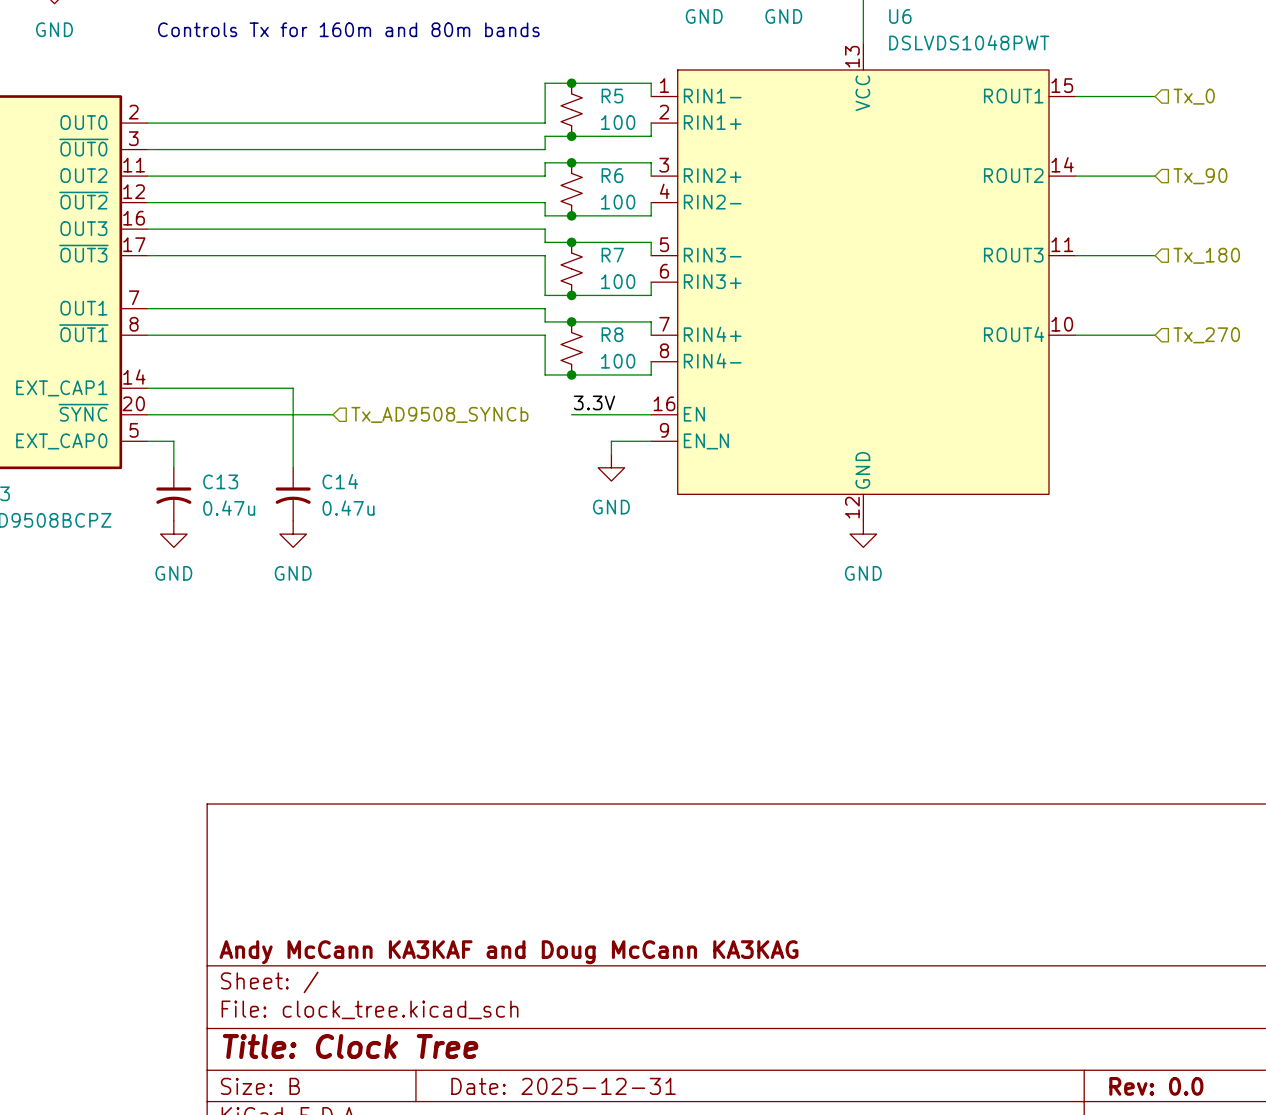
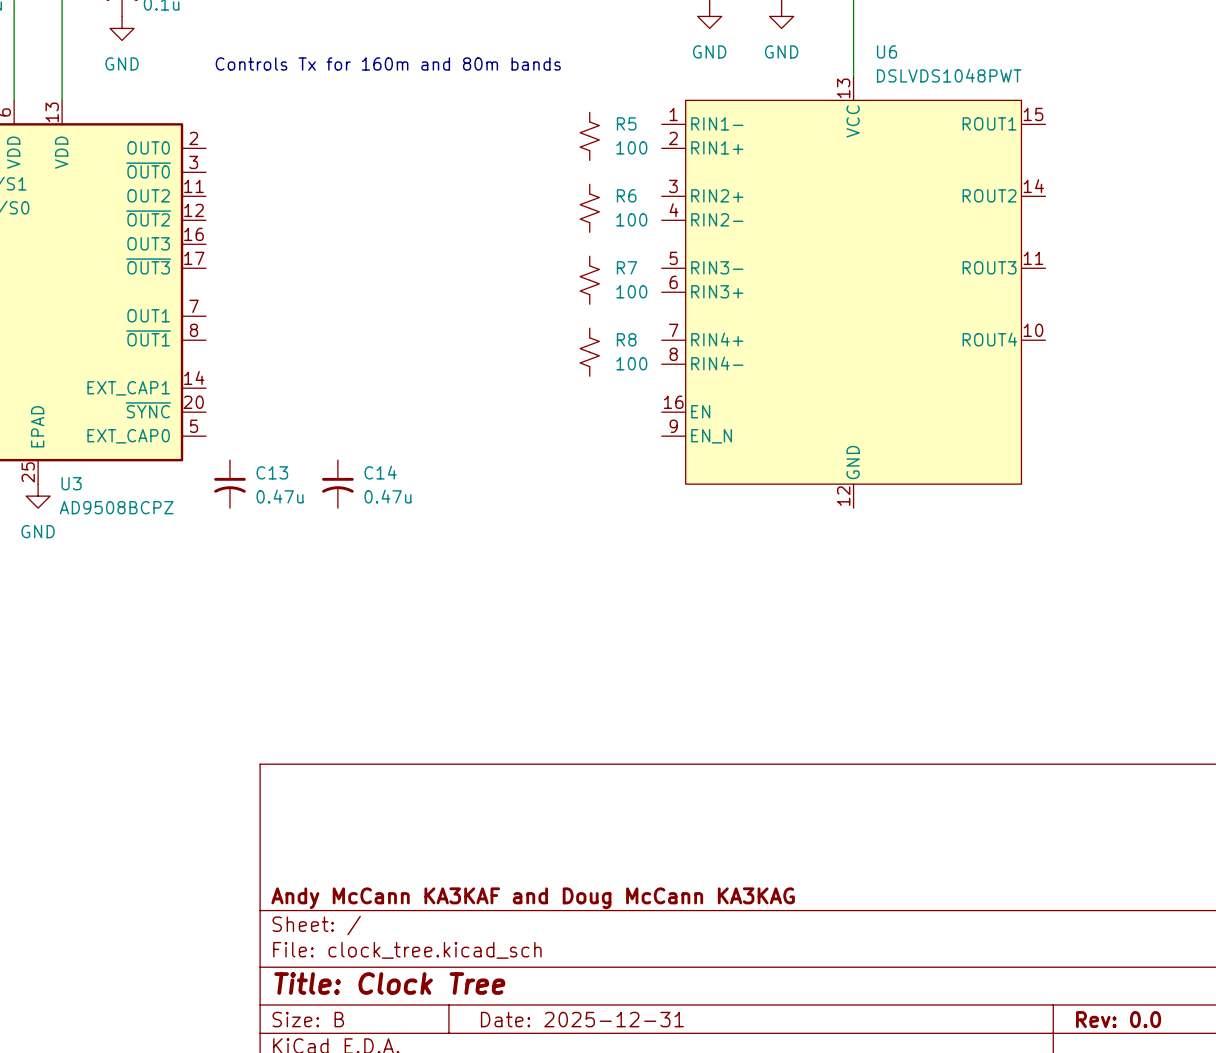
junction: (571, 83) -> none
wire: (651, 96) (651, 83) (545, 83) (545, 123) (147, 123) -> none
wire: (1075, 96) (1155, 96) -> none
hierarchical label: Tx_0 (1194, 96) -> none
wire: (651, 123) (651, 136) (545, 136) (545, 149) (147, 149) -> none
junction: (571, 136) -> none
junction: (571, 162) -> none
wire: (147, 176) (545, 176) (545, 162) (651, 162) (651, 176) -> none
wire: (1075, 176) (1155, 176) -> none
hierarchical label: Tx_90 (1200, 176) -> none
wire: (147, 202) (545, 202) (545, 215) (651, 215) (651, 202) -> none
junction: (571, 215) -> none
wire: (147, 229) (545, 229) (545, 242) (651, 242) (651, 255) -> none
junction: (571, 242) -> none
wire: (147, 255) (545, 255) (545, 295) (651, 295) (651, 282) -> none
wire: (1075, 255) (1155, 255) -> none
hierarchical label: Tx_180 (1206, 255) -> none
junction: (571, 295) -> none
wire: (147, 308) (545, 308) (545, 321) (651, 321) (651, 335) -> none
junction: (571, 321) -> none
wire: (147, 335) (545, 335) (545, 374) (651, 374) (651, 361) -> none
wire: (1075, 335) (1155, 335) -> none
hierarchical label: Tx_270 (1206, 335) -> none
junction: (571, 374) -> none
wire: (147, 388) (293, 388) (293, 467) -> none
label: 3.3V (594, 402) -> none
wire: (147, 414) (332, 414) -> none
hierarchical label: Tx_AD9508_SYNCb (439, 414) -> none
wire: (571, 414) (651, 414) -> none
wire: (147, 441) (173, 441) (173, 467) -> none
wire: (651, 441) (611, 441) (611, 454) -> none
power symbol: GND (611, 467) -> none
power symbol: GND (173, 534) -> none
power symbol: GND (293, 534) -> none
power symbol: GND (863, 534) -> none

